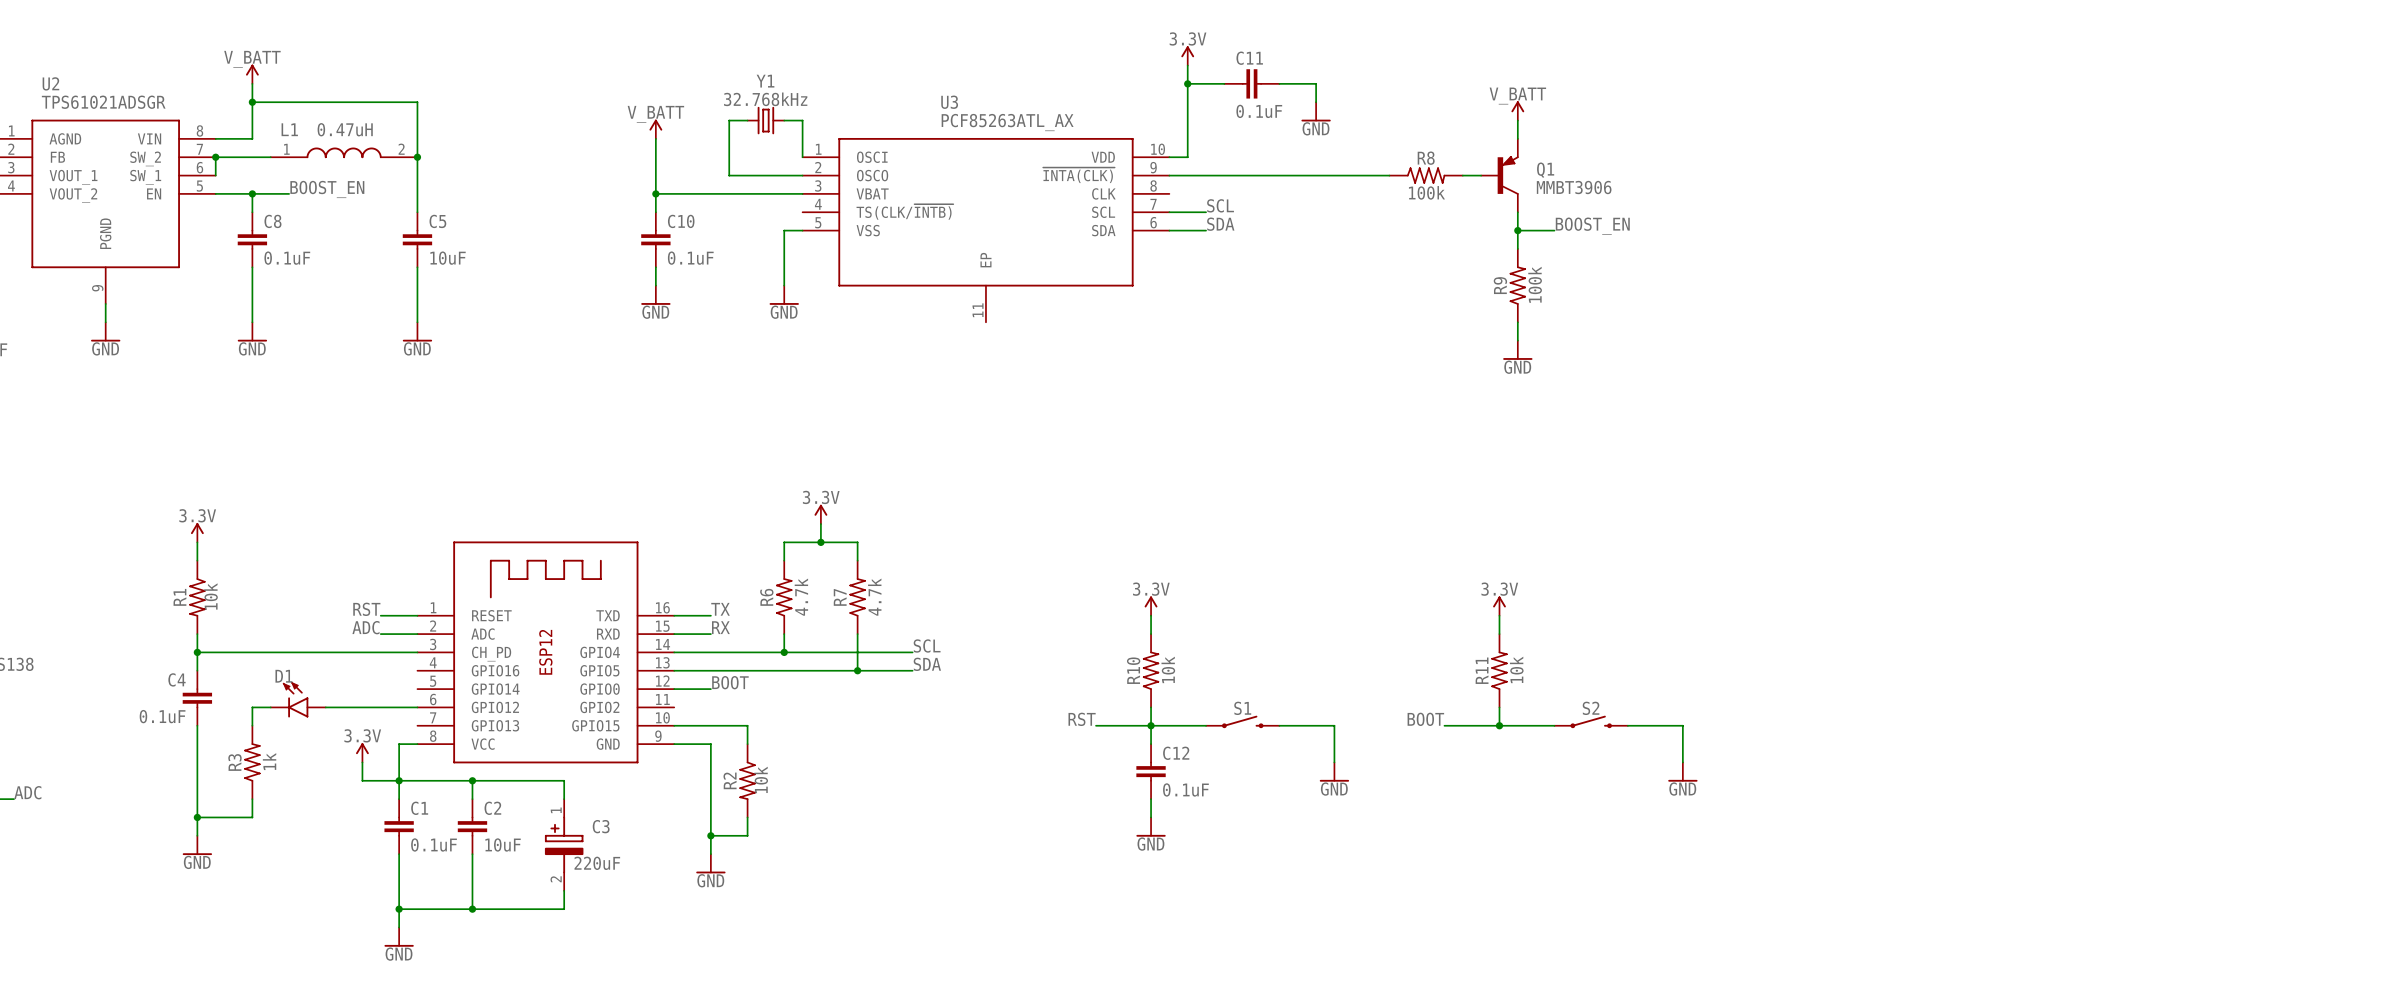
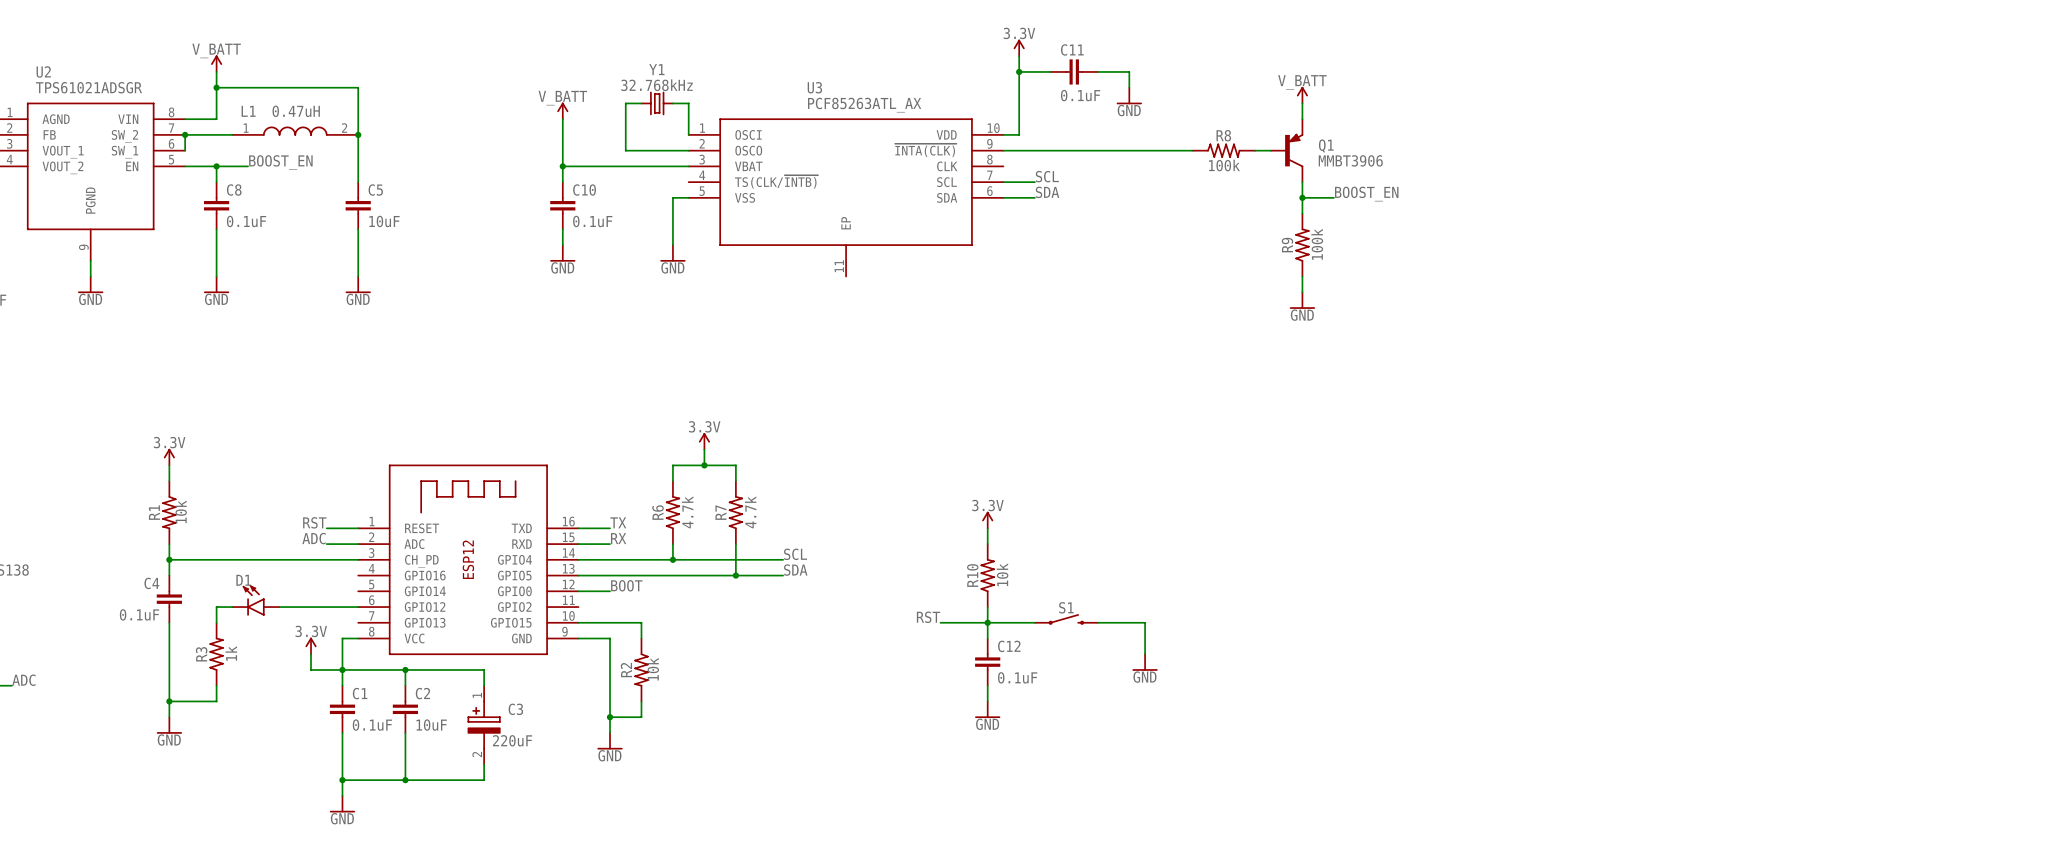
power symbol: 3.3V (1499, 606) -> none
wire: (1499, 615) (1499, 634) -> none
R11: 10k (1499, 670) -> none
wire: (1499, 707) (1499, 725) -> none
label: BOOT (1425, 719) -> none
S2: (1591, 721) -> none
wire: (1444, 725) (1554, 725) -> none
junction: (1499, 725) -> none
wire: (1627, 725) (1682, 725) (1682, 762) -> none
power symbol: GND (1682, 772) -> none

